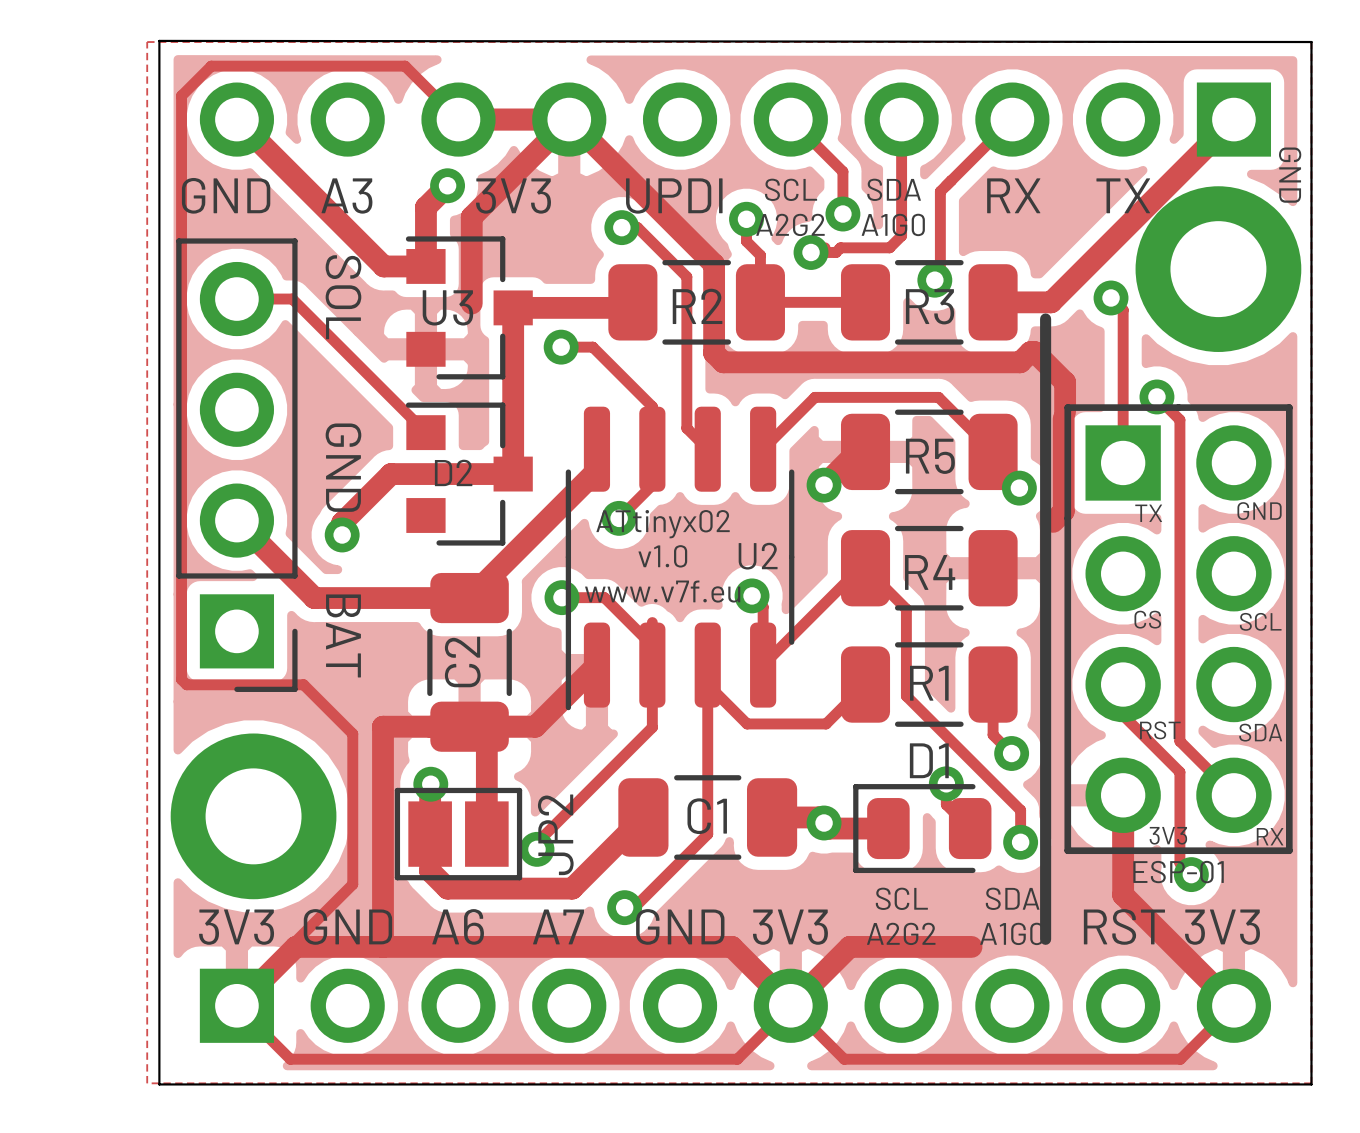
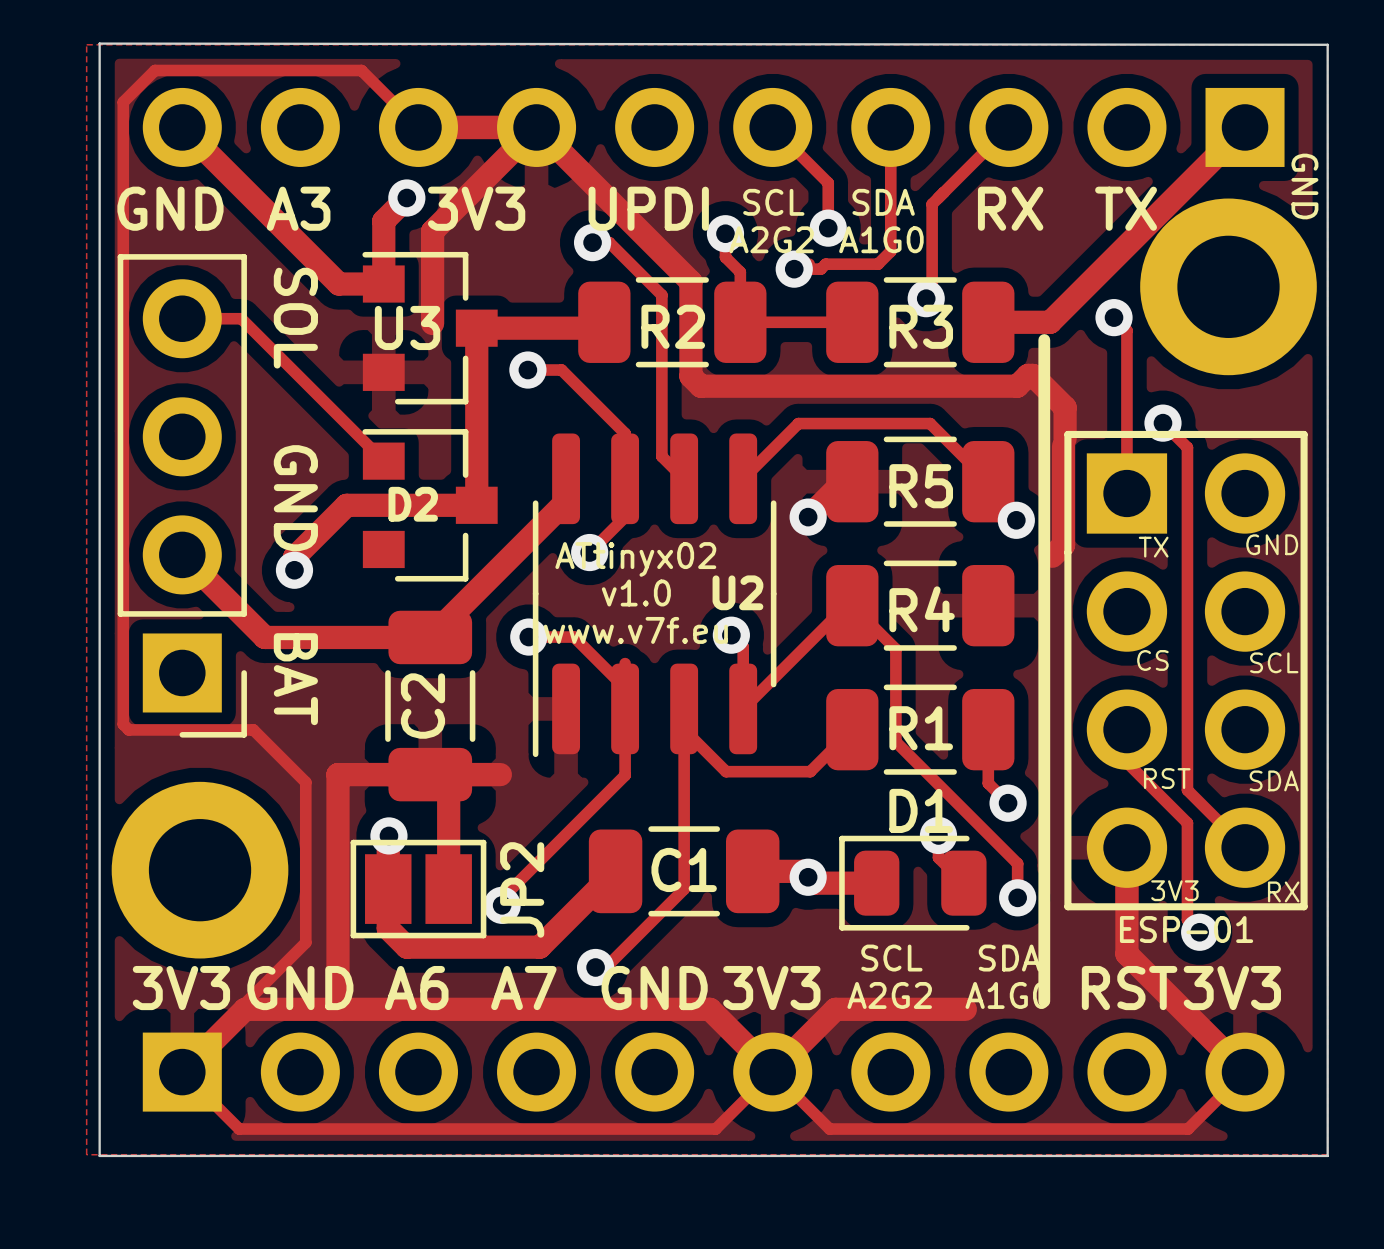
track: (596, 665) (535, 726) -> none

